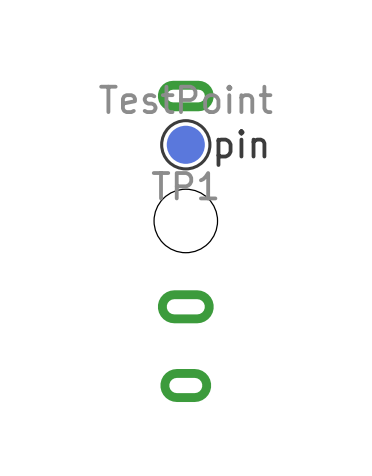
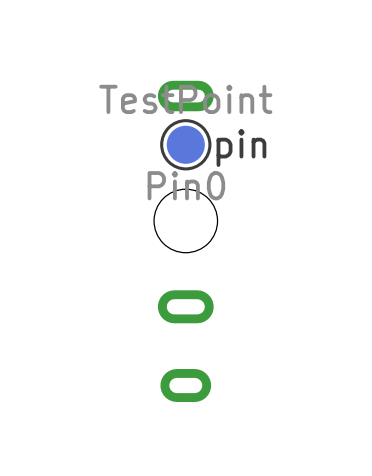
TP1 name: TP1 (184, 185) -> Pin0 (186, 185)

